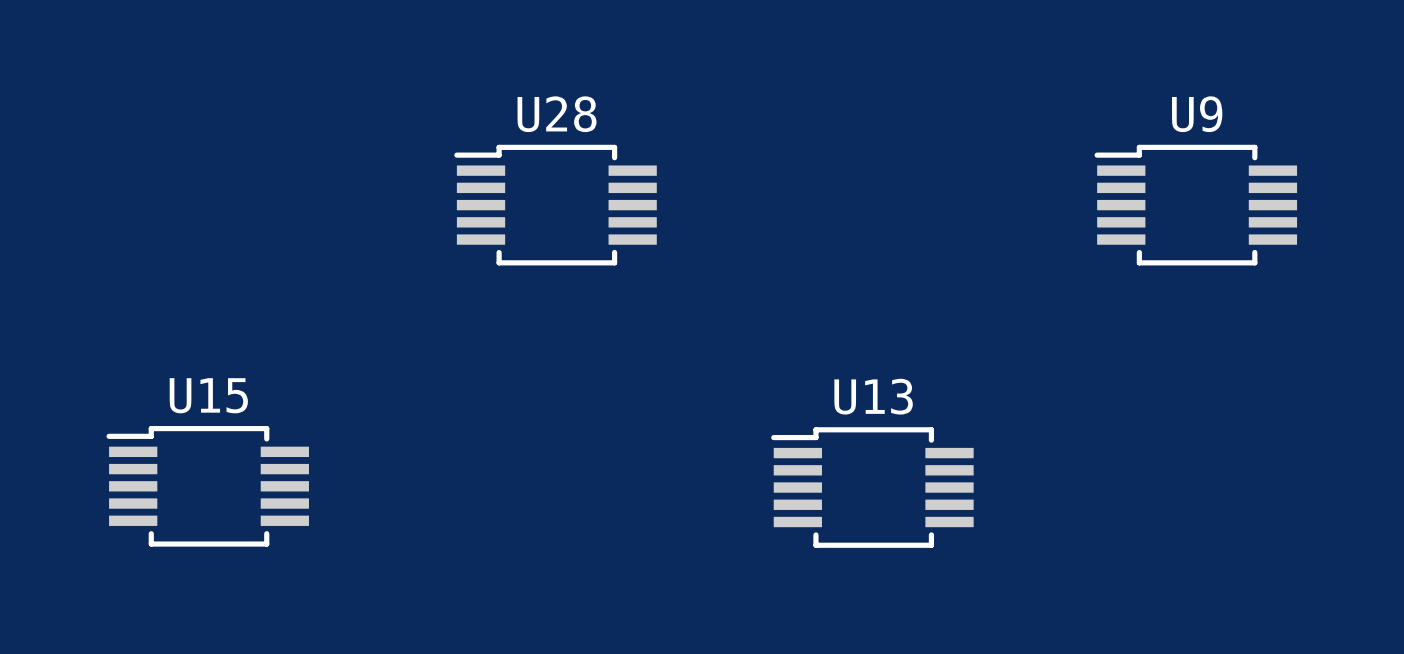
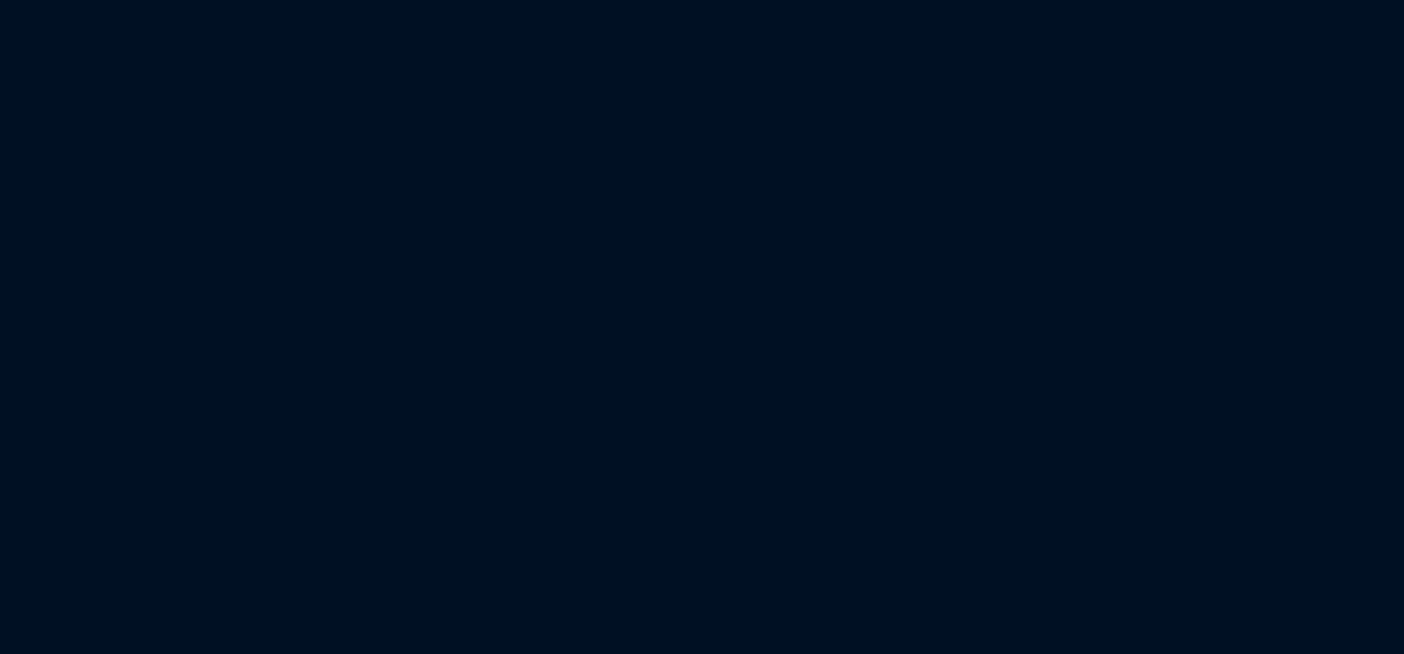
U28: (555, 205) -> none
U9: (1195, 205) -> none
U15: (207, 486) -> none
U13: (872, 487) -> none

